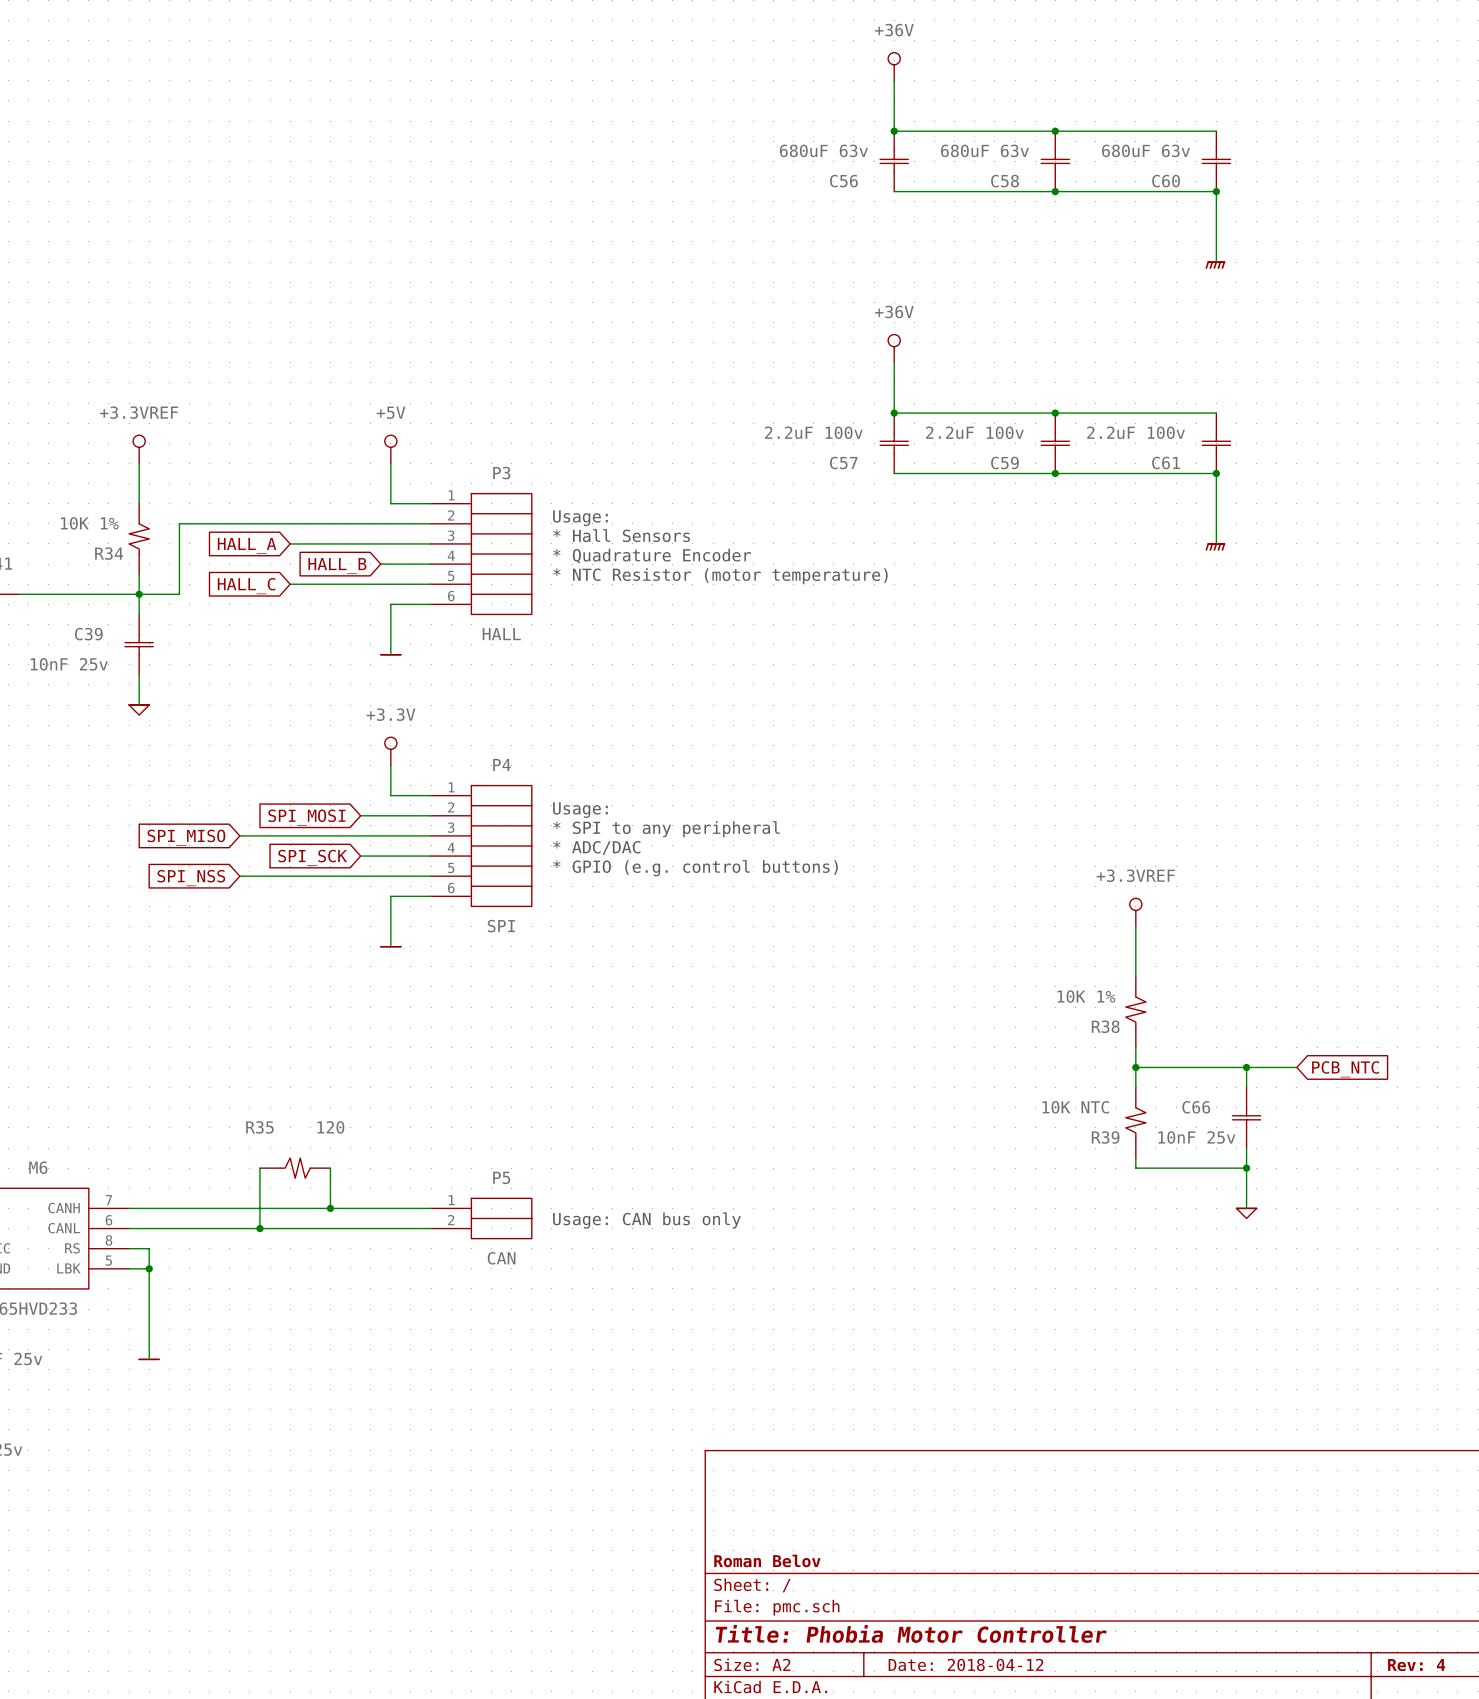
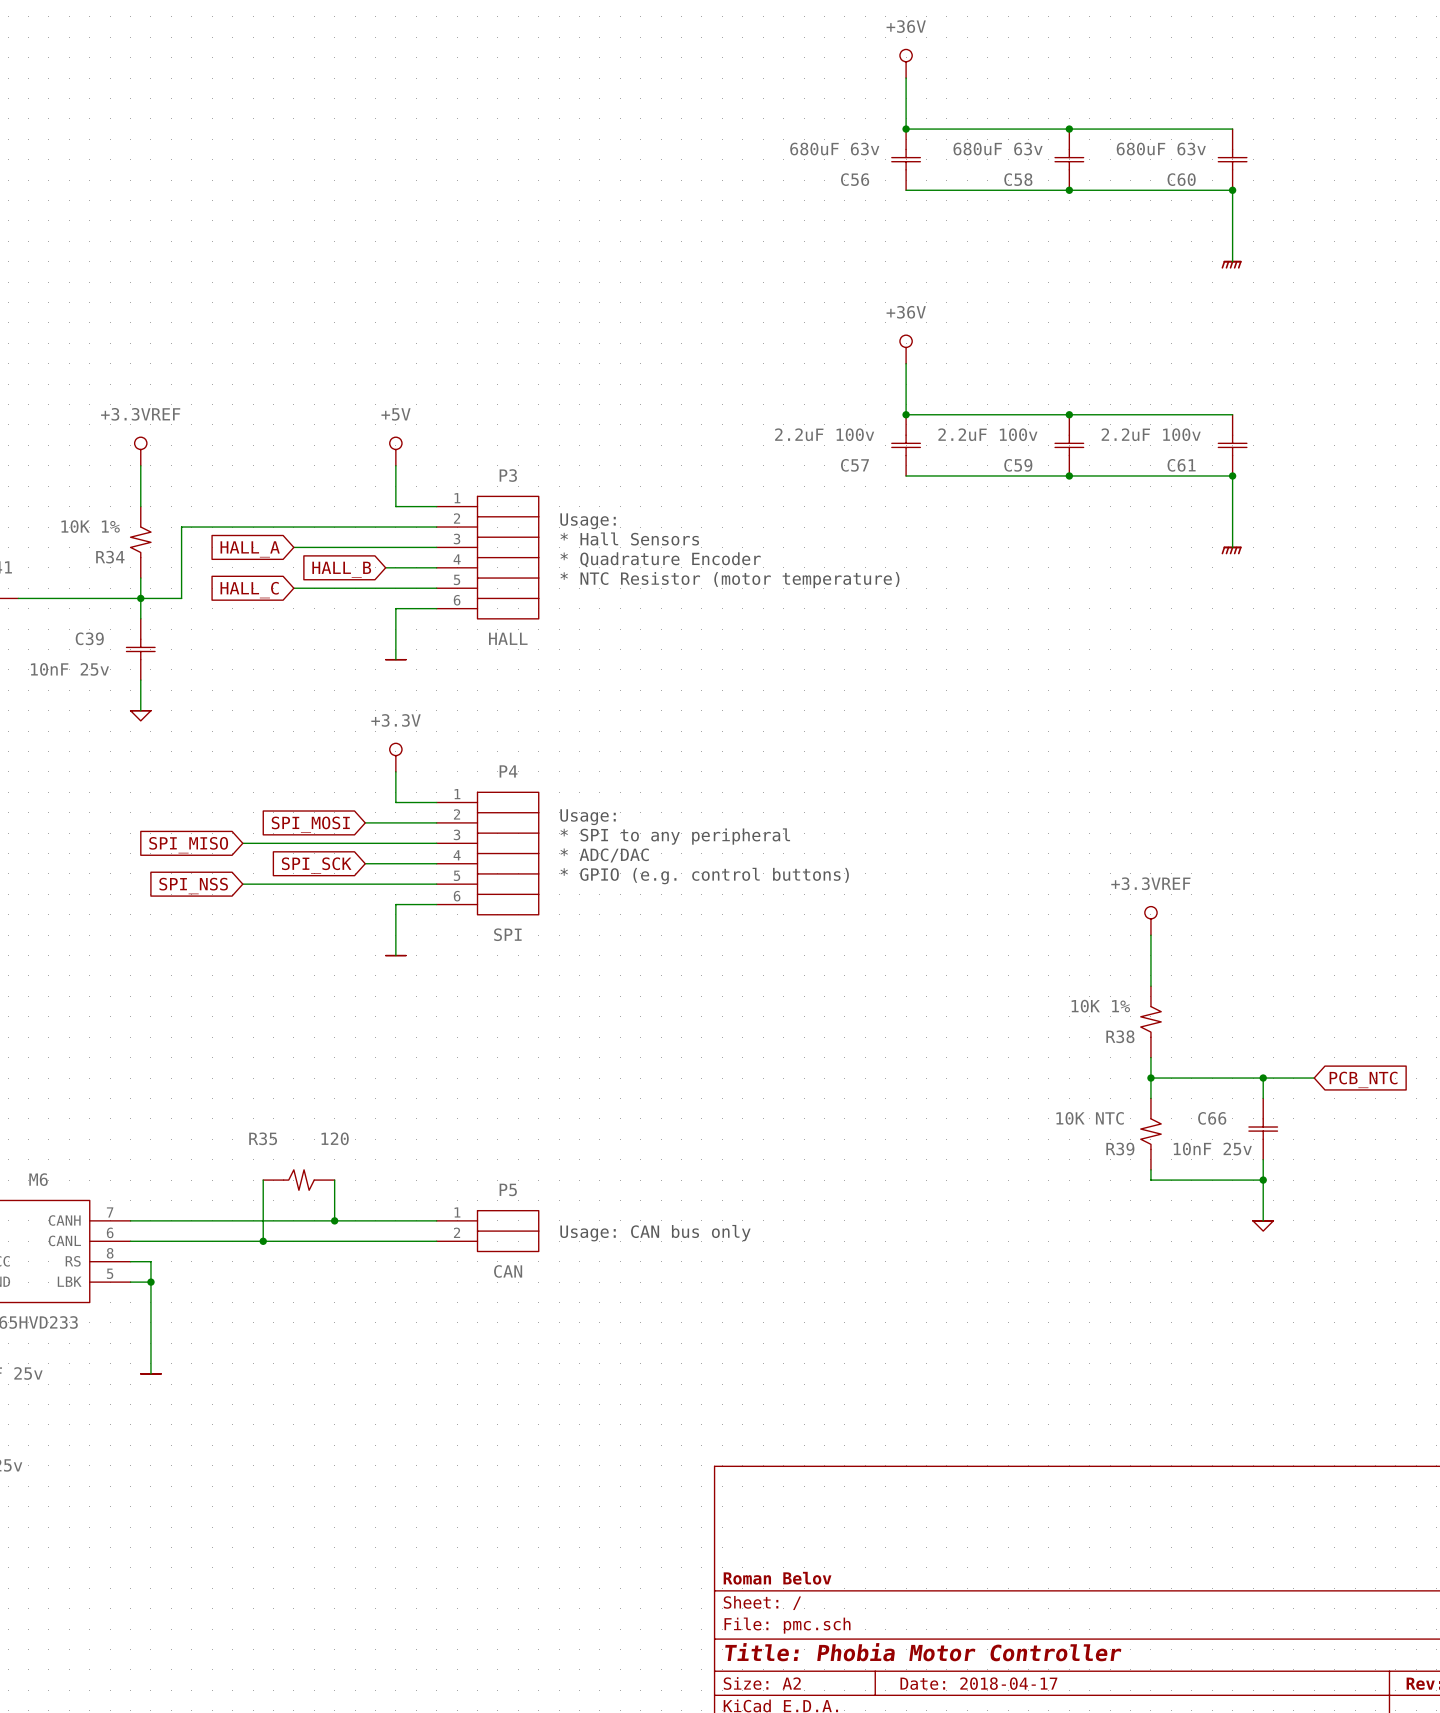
title block: Date: 2018-04-12 (966, 1664) -> Date: 2018-04-17 (978, 1683)

